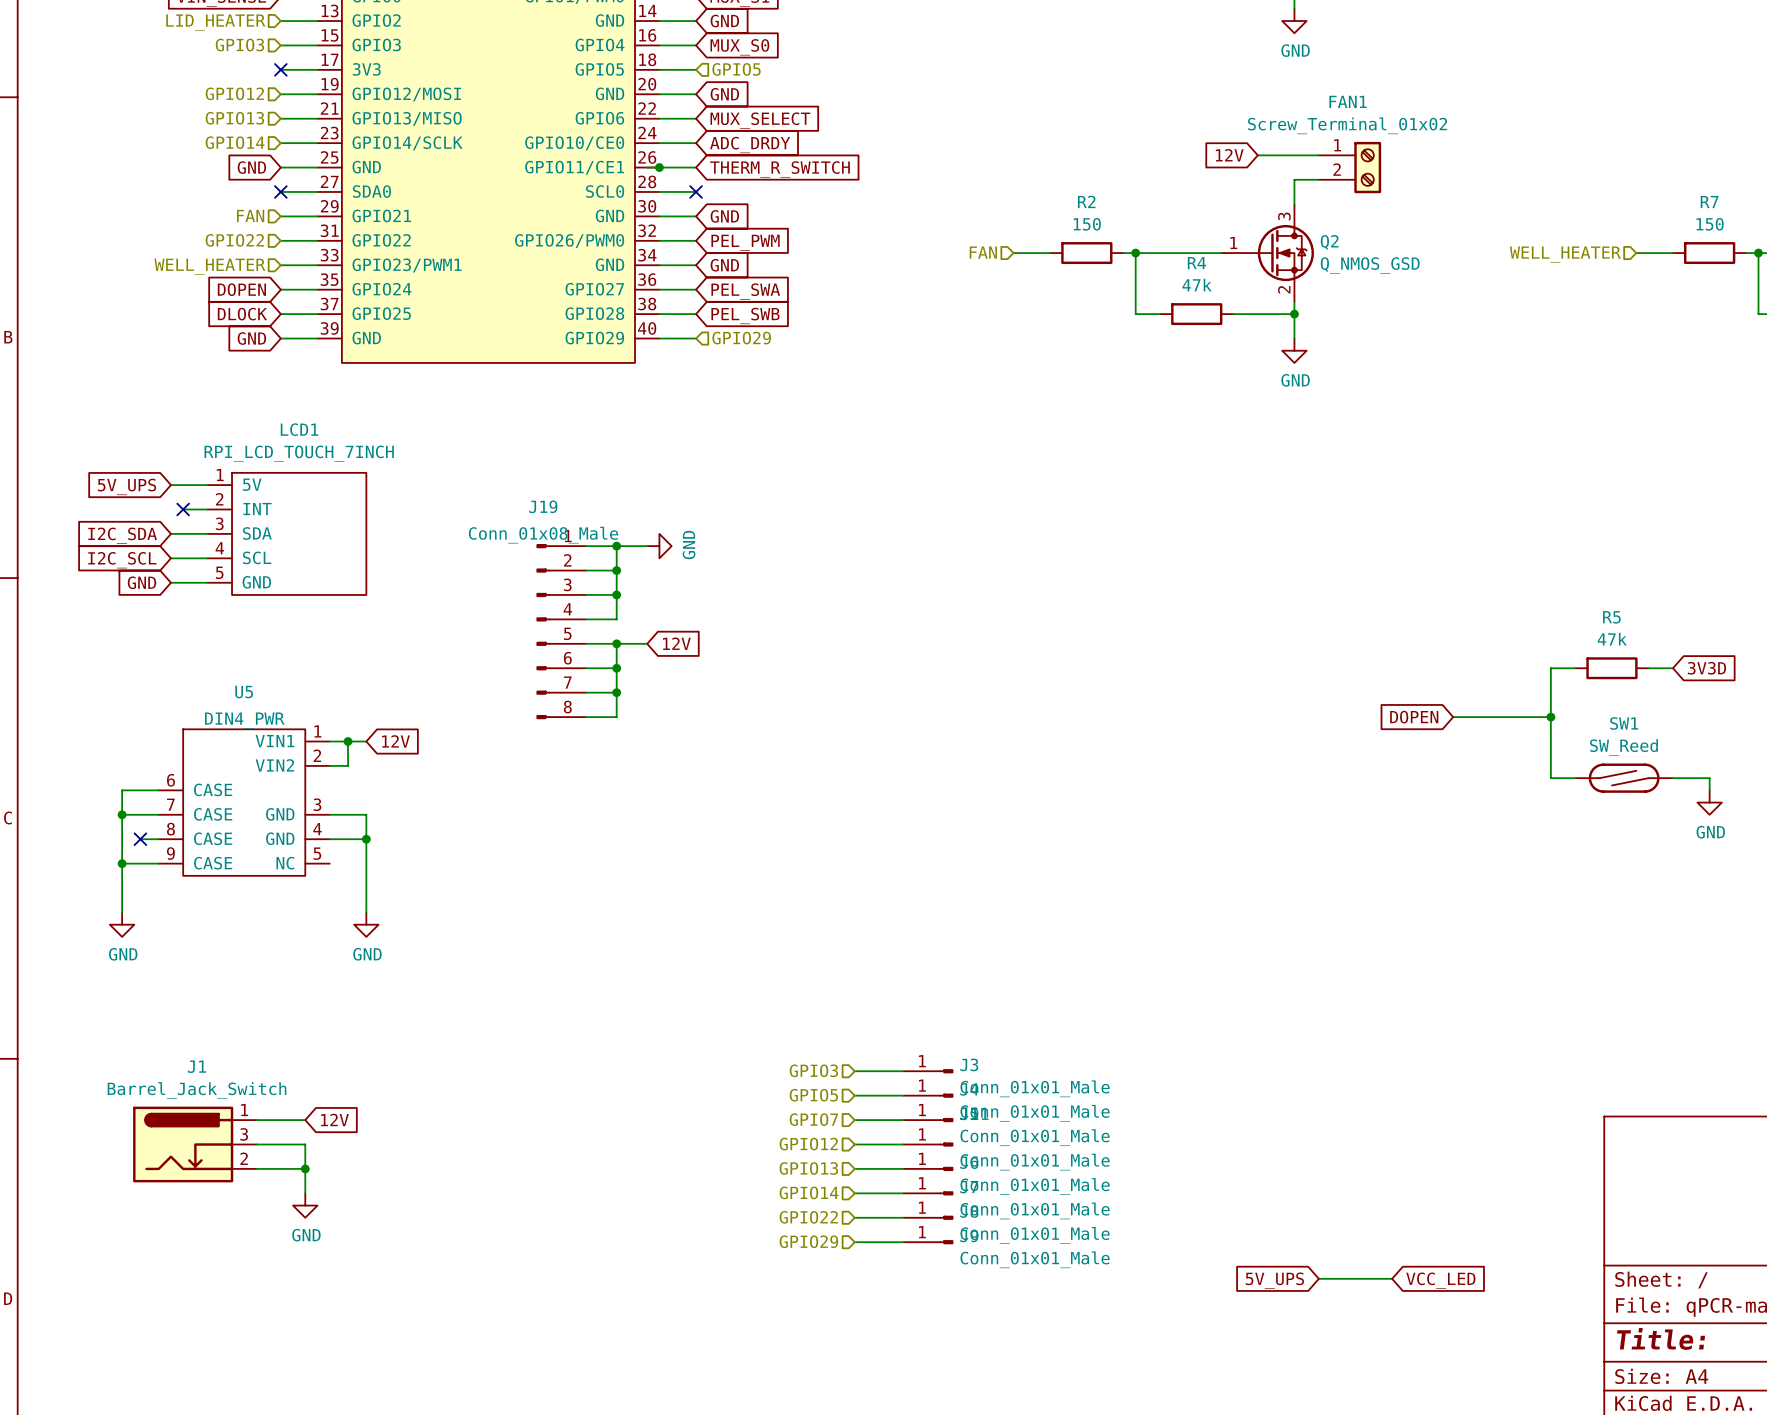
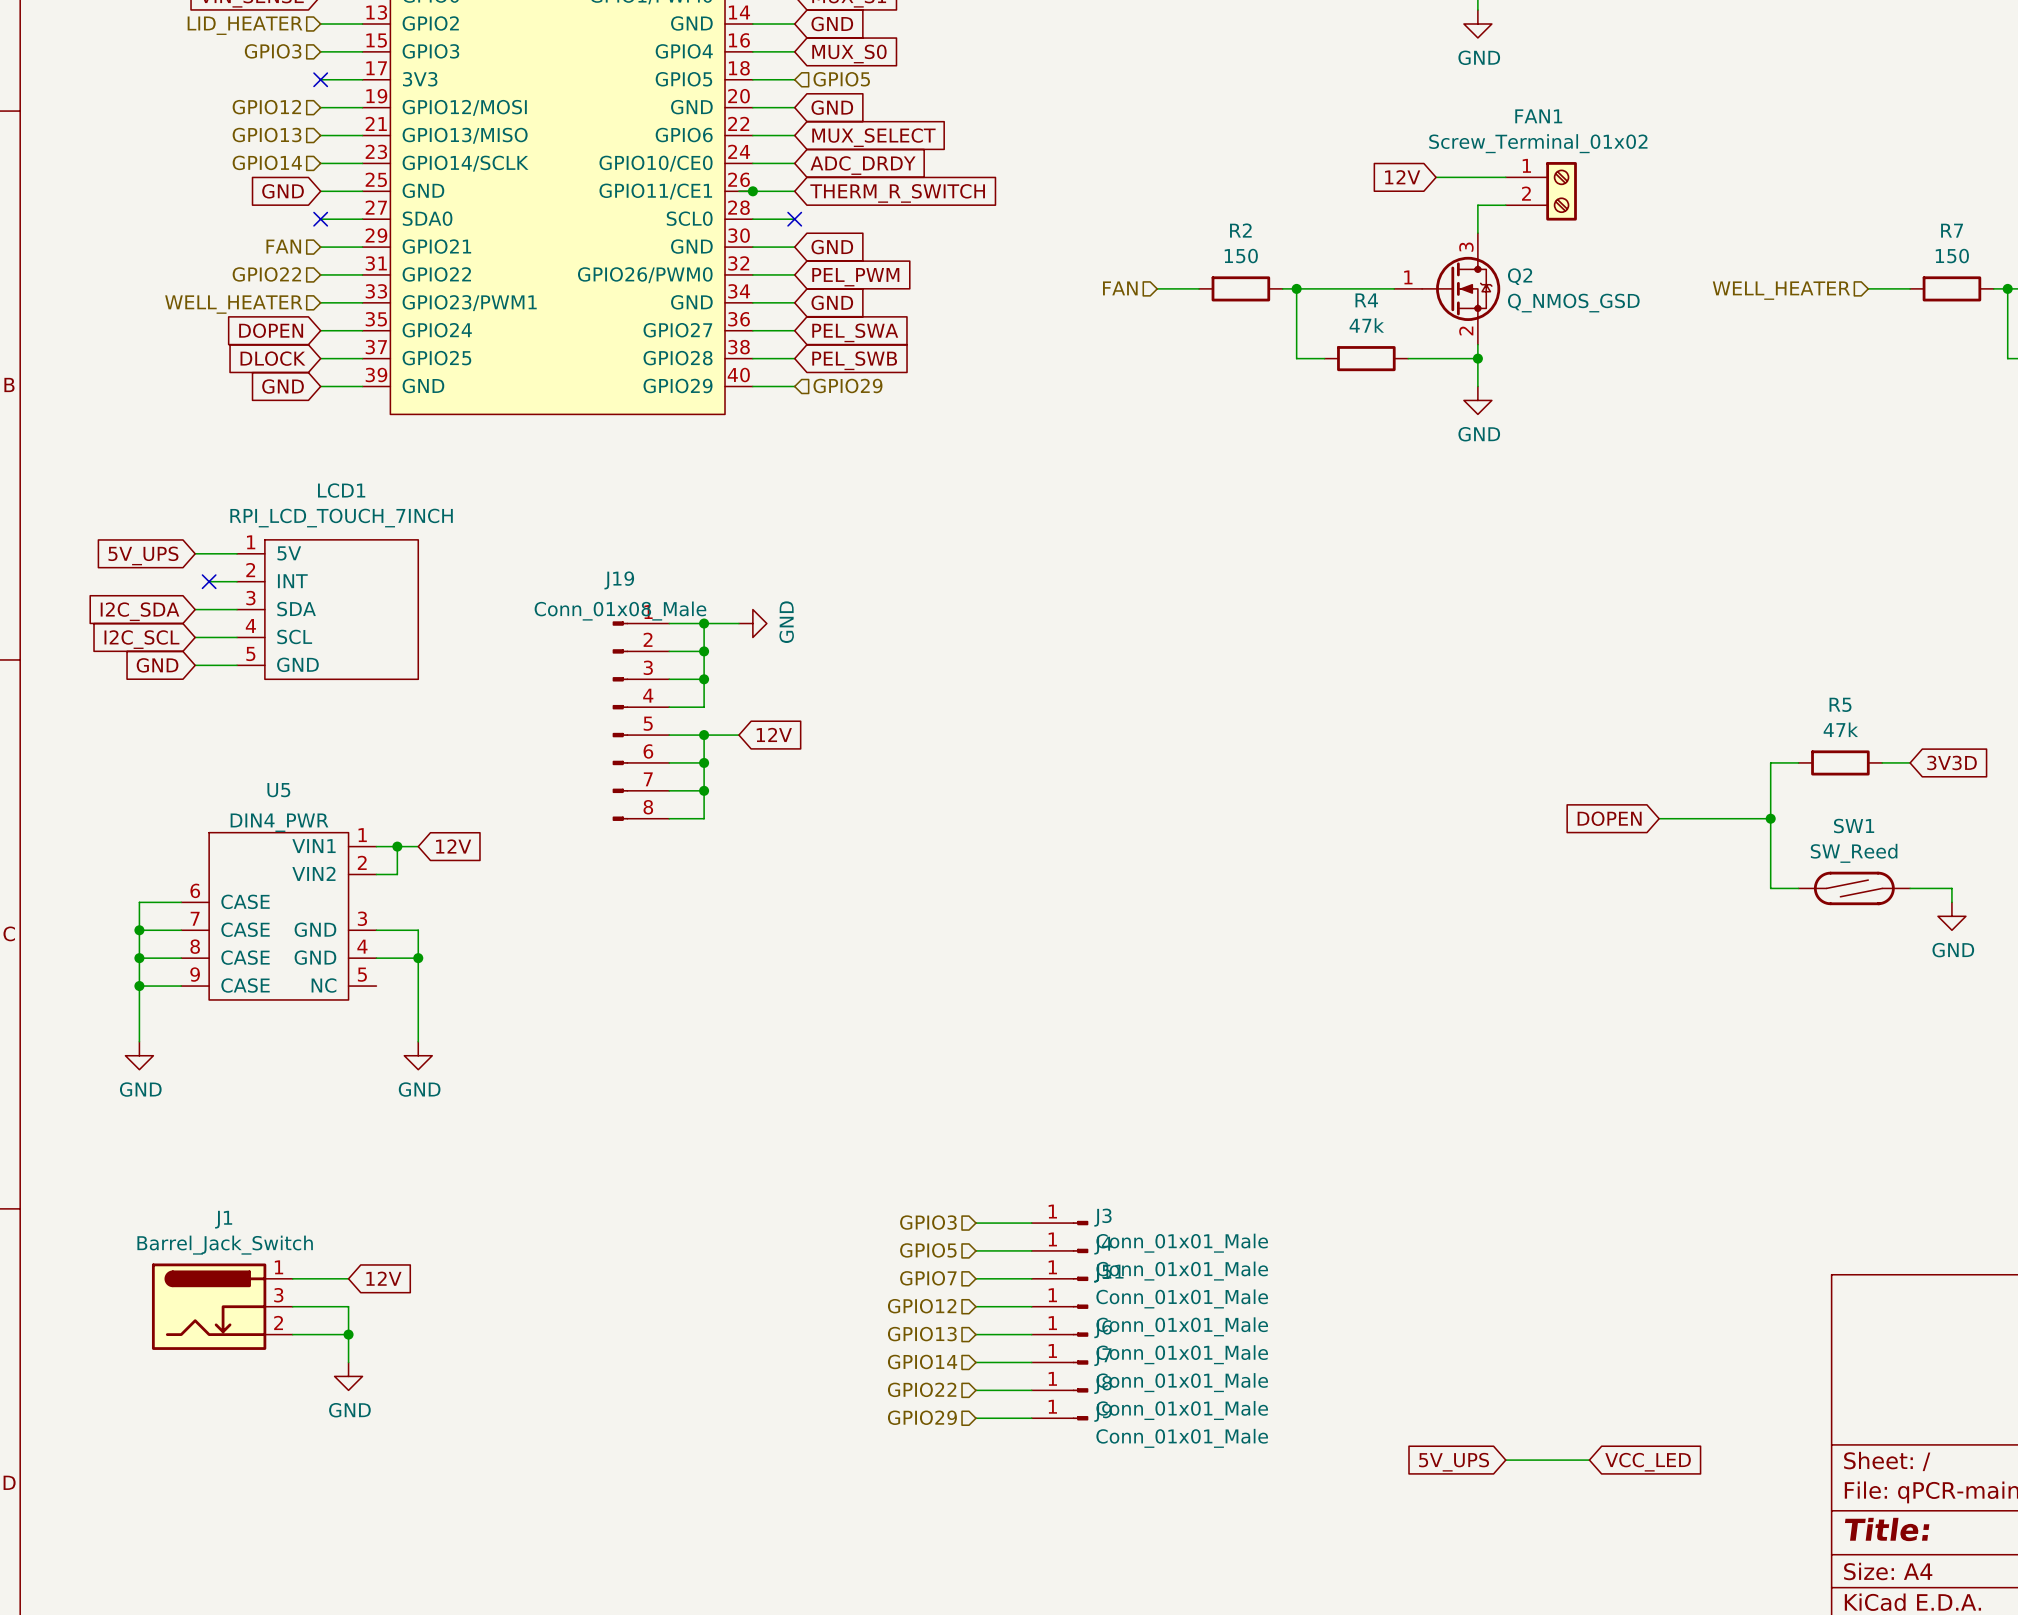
wire: none -> (139, 958) (160, 958)
junction: none -> (139, 958)
no-connect mark: (140, 839) -> none

